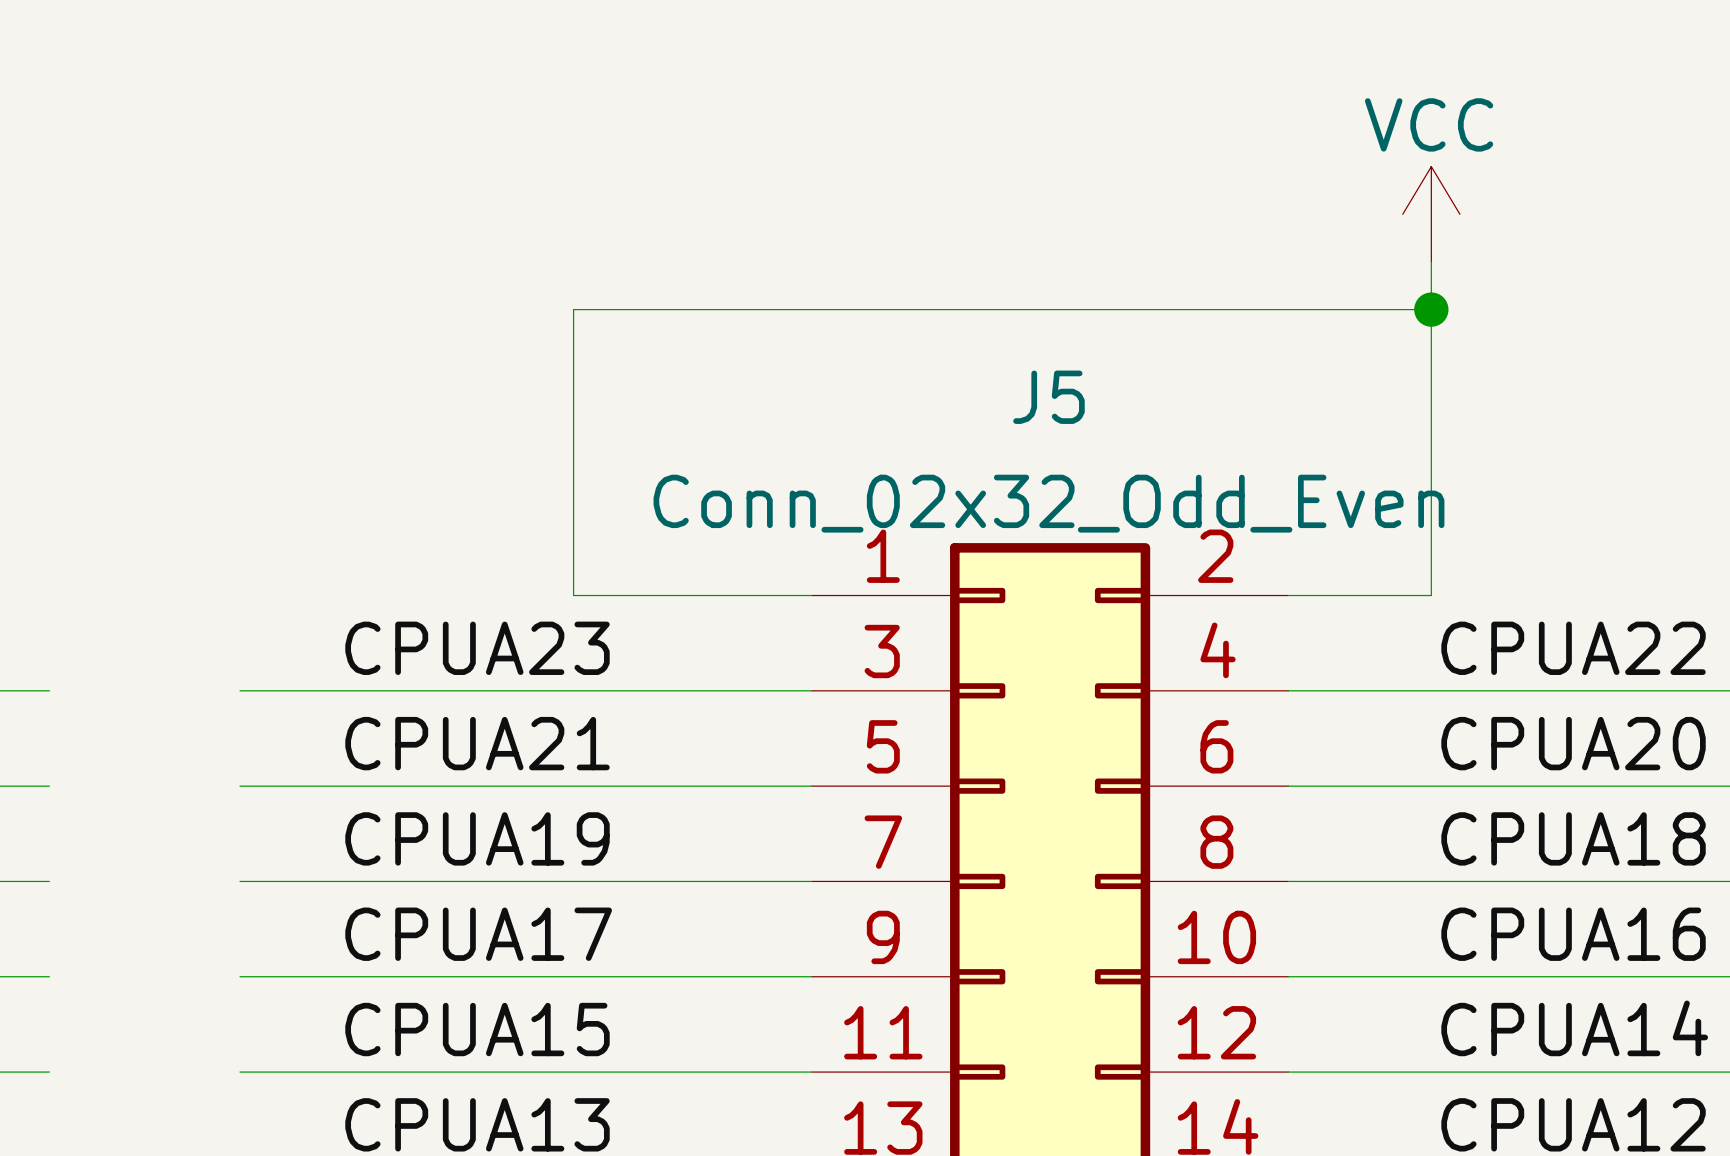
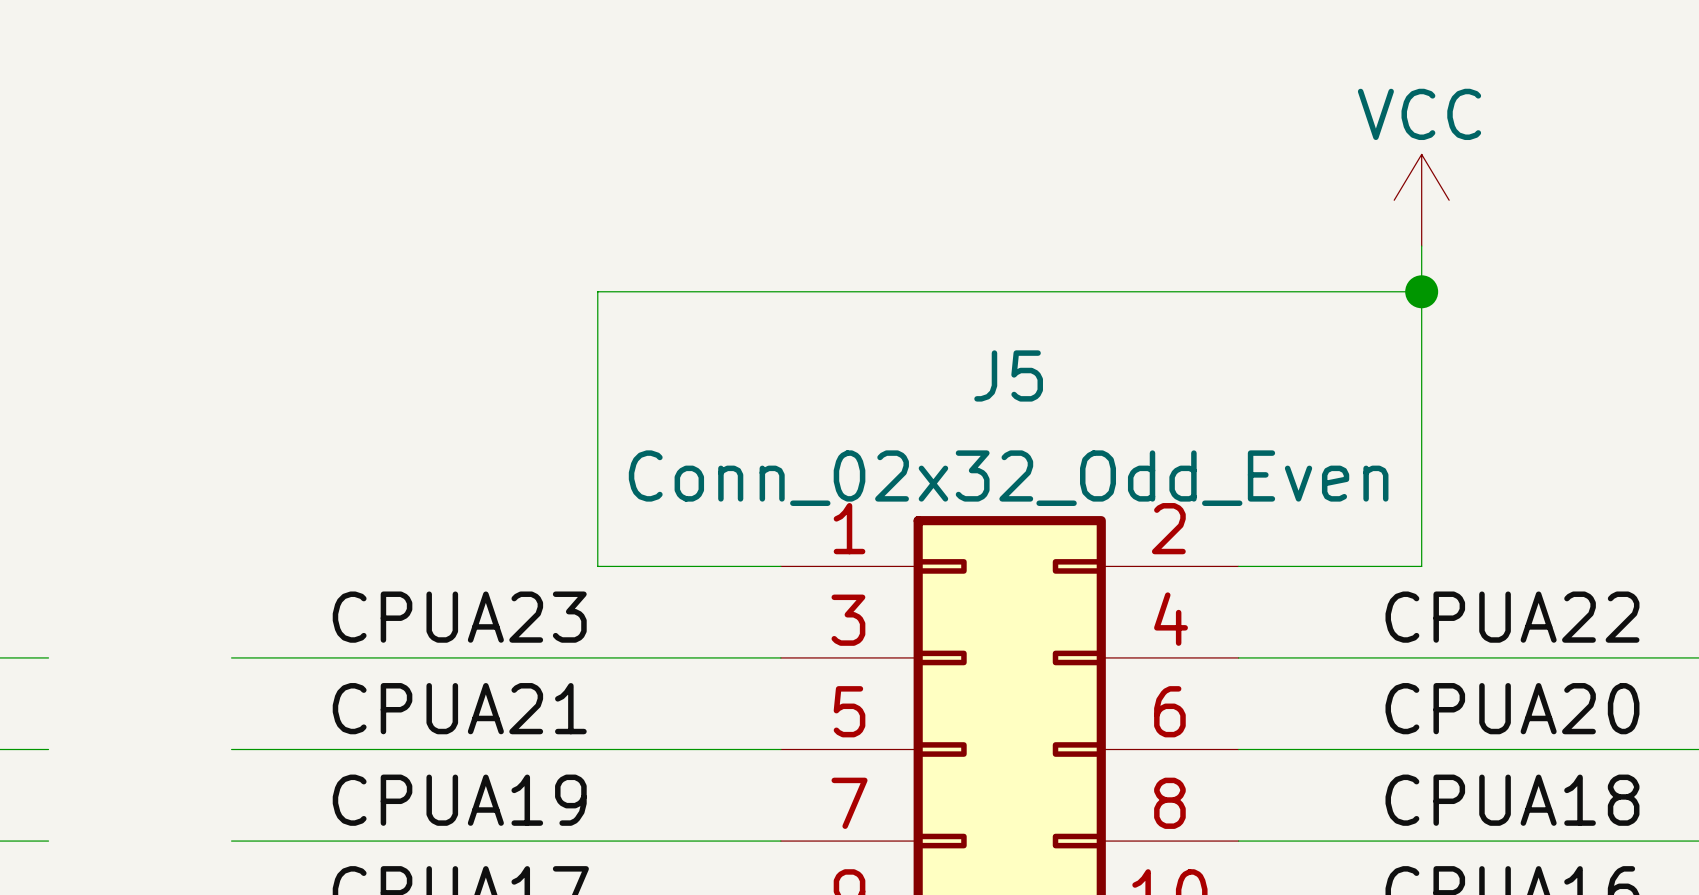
power symbol position: VCC (1431, 214) -> VCC (1421, 200)
wire: (1431, 261) (1431, 595) -> (1421, 246) (1421, 566) (1375, 566)
wire: (621, 309) (573, 309) (573, 595) (621, 595) -> (597, 291) (597, 566)
wire: none -> (1375, 291) (1421, 291)
junction position: (1431, 309) -> (1421, 291)

